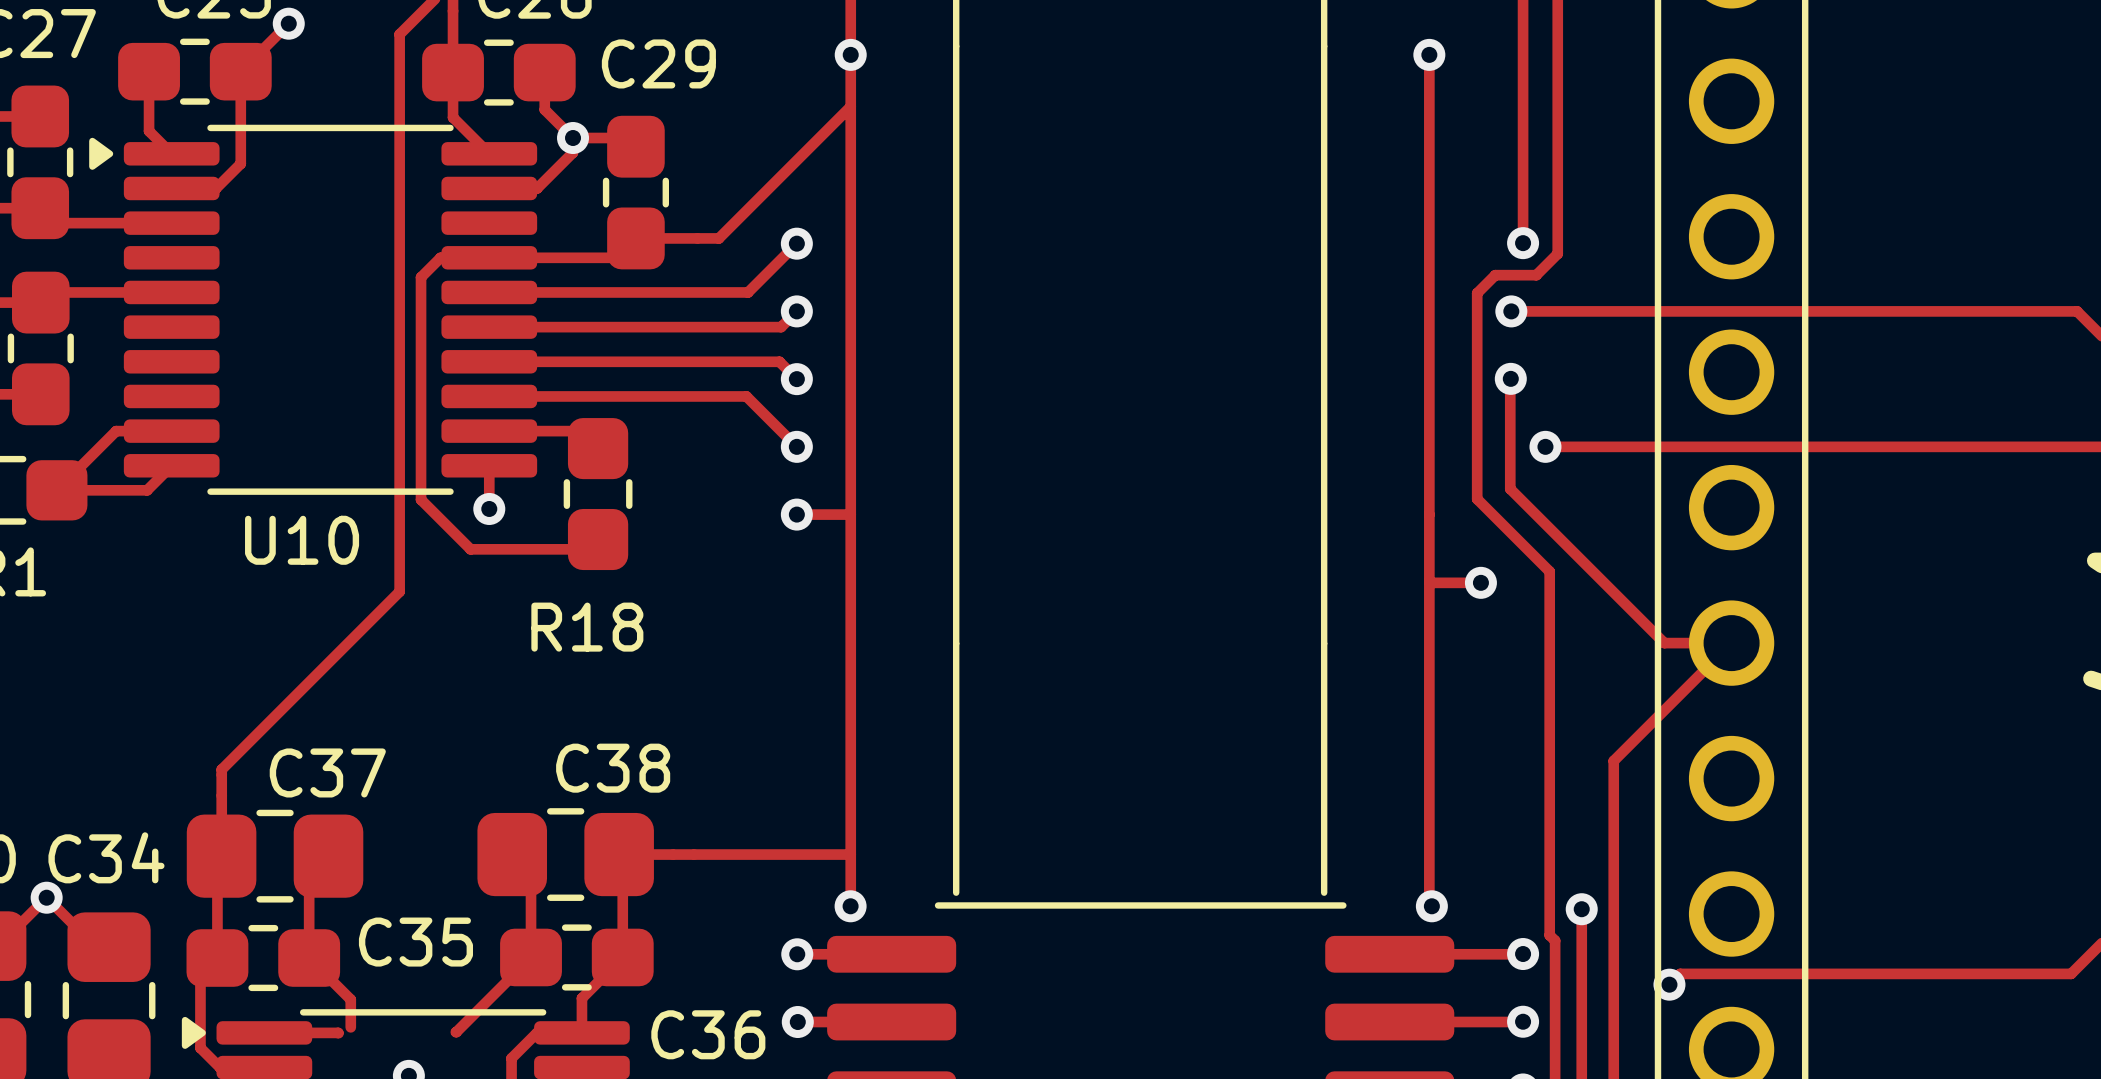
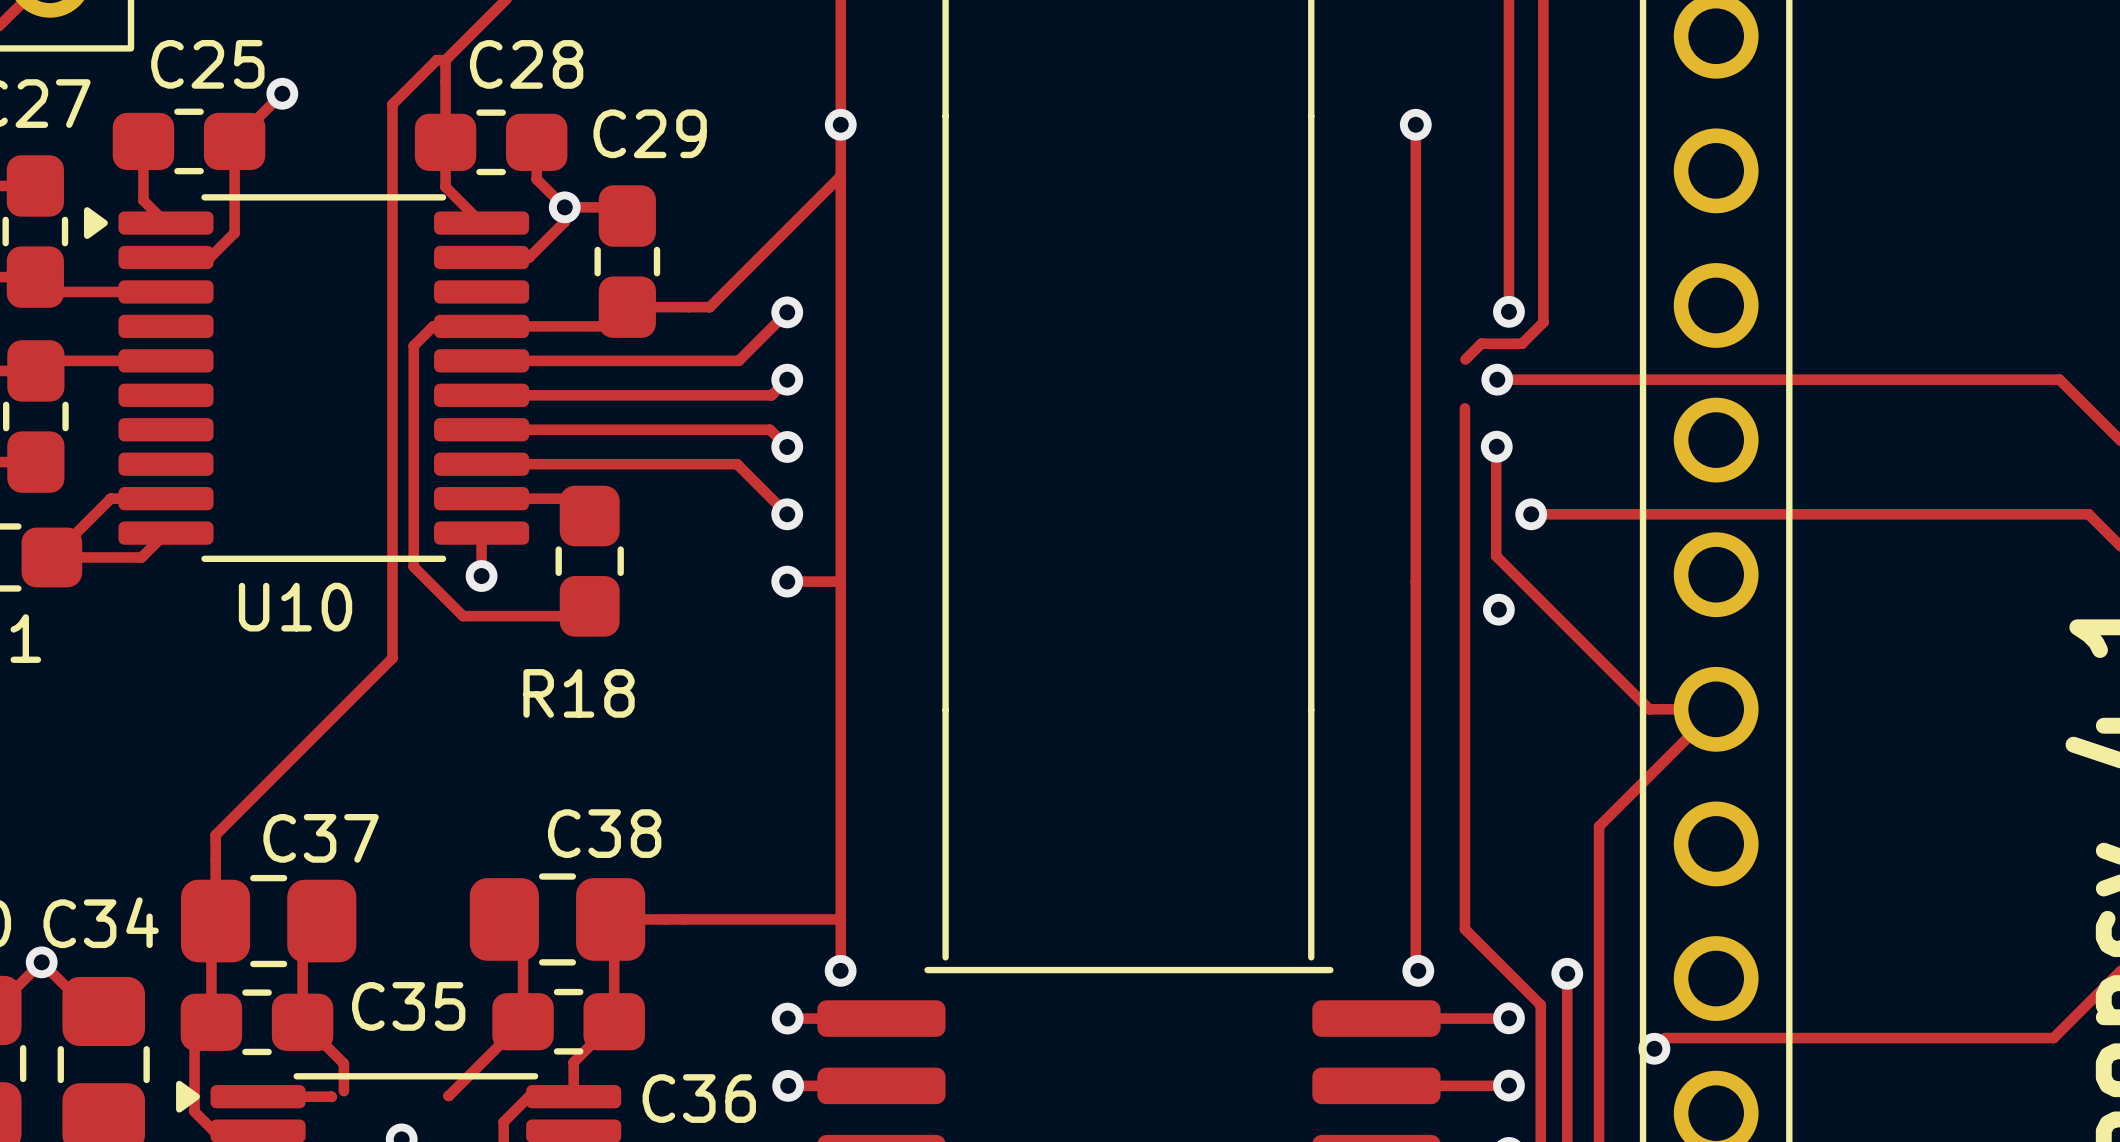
track: (1479, 291) (1477, 293) (1477, 499) (1549, 571) (1549, 935) -> (1464, 408) (1464, 929) (1535, 999)
track: (1429, 581) (1480, 582) -> none
via position: (1480, 582) -> (1498, 609)

